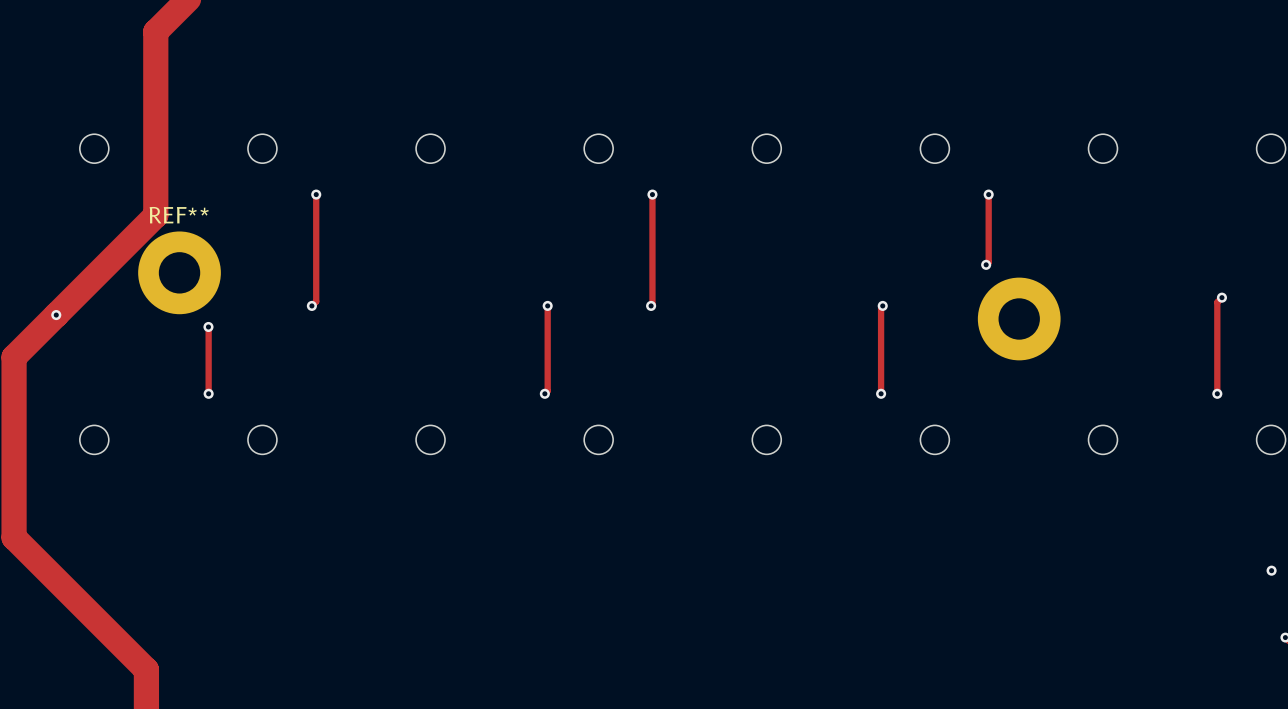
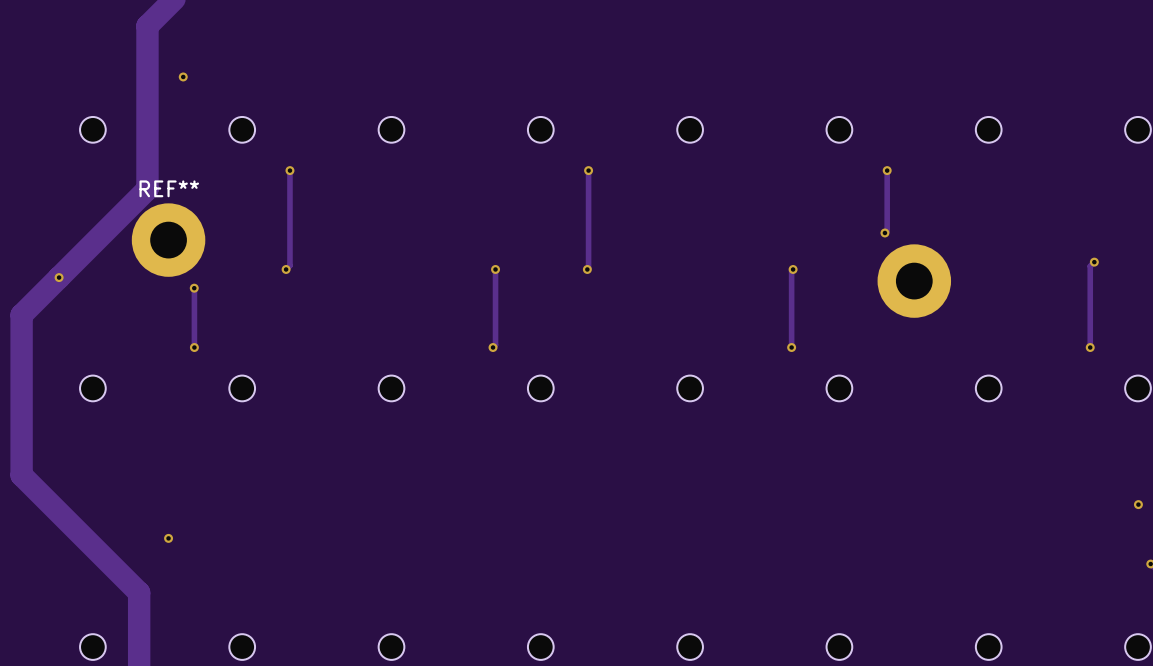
via: none -> (183, 76)
via: none -> (168, 538)

